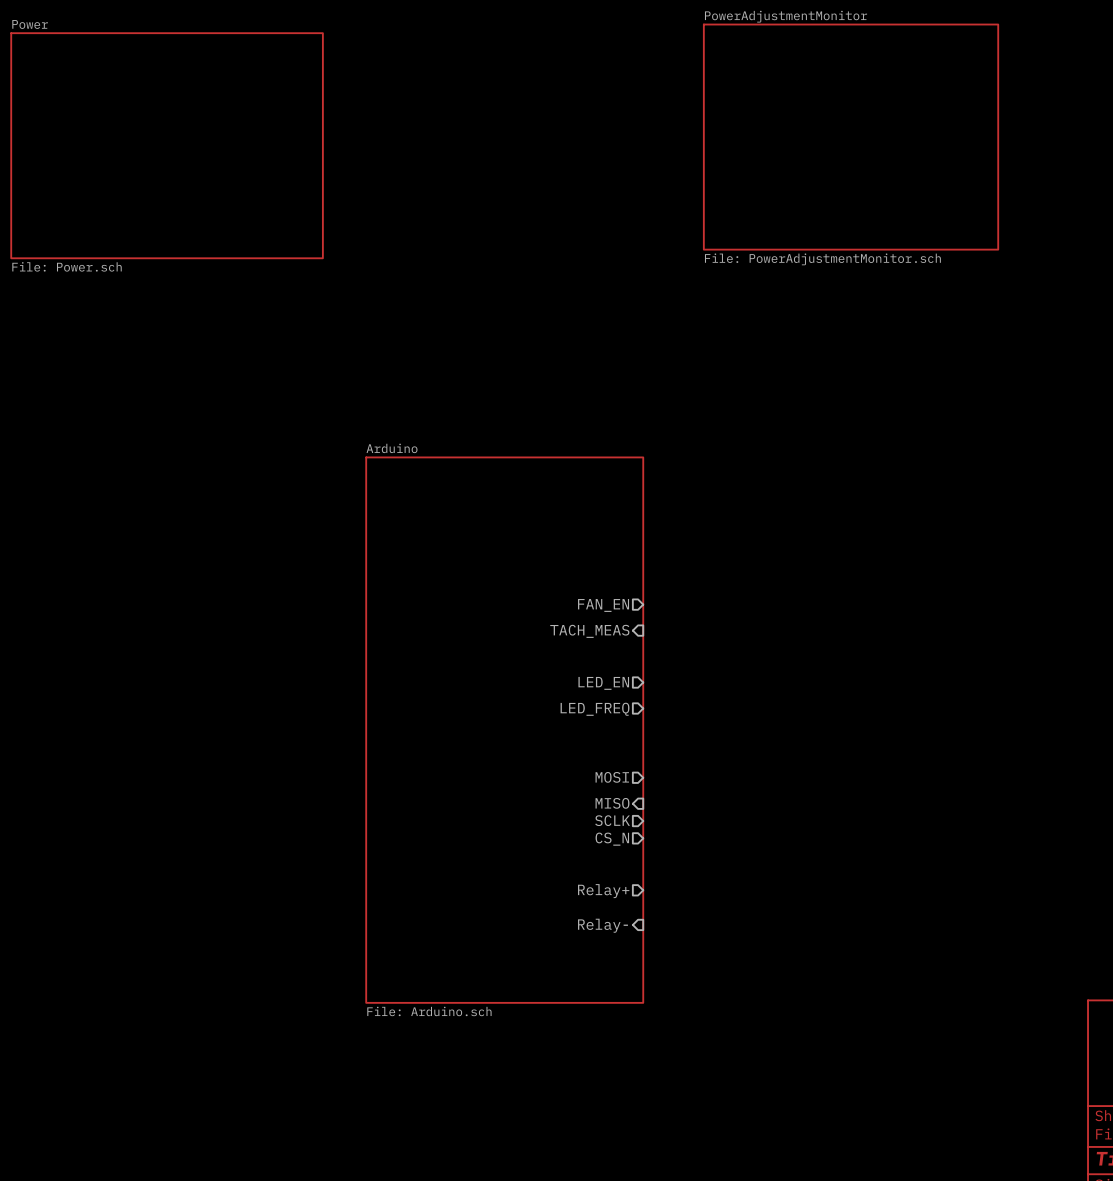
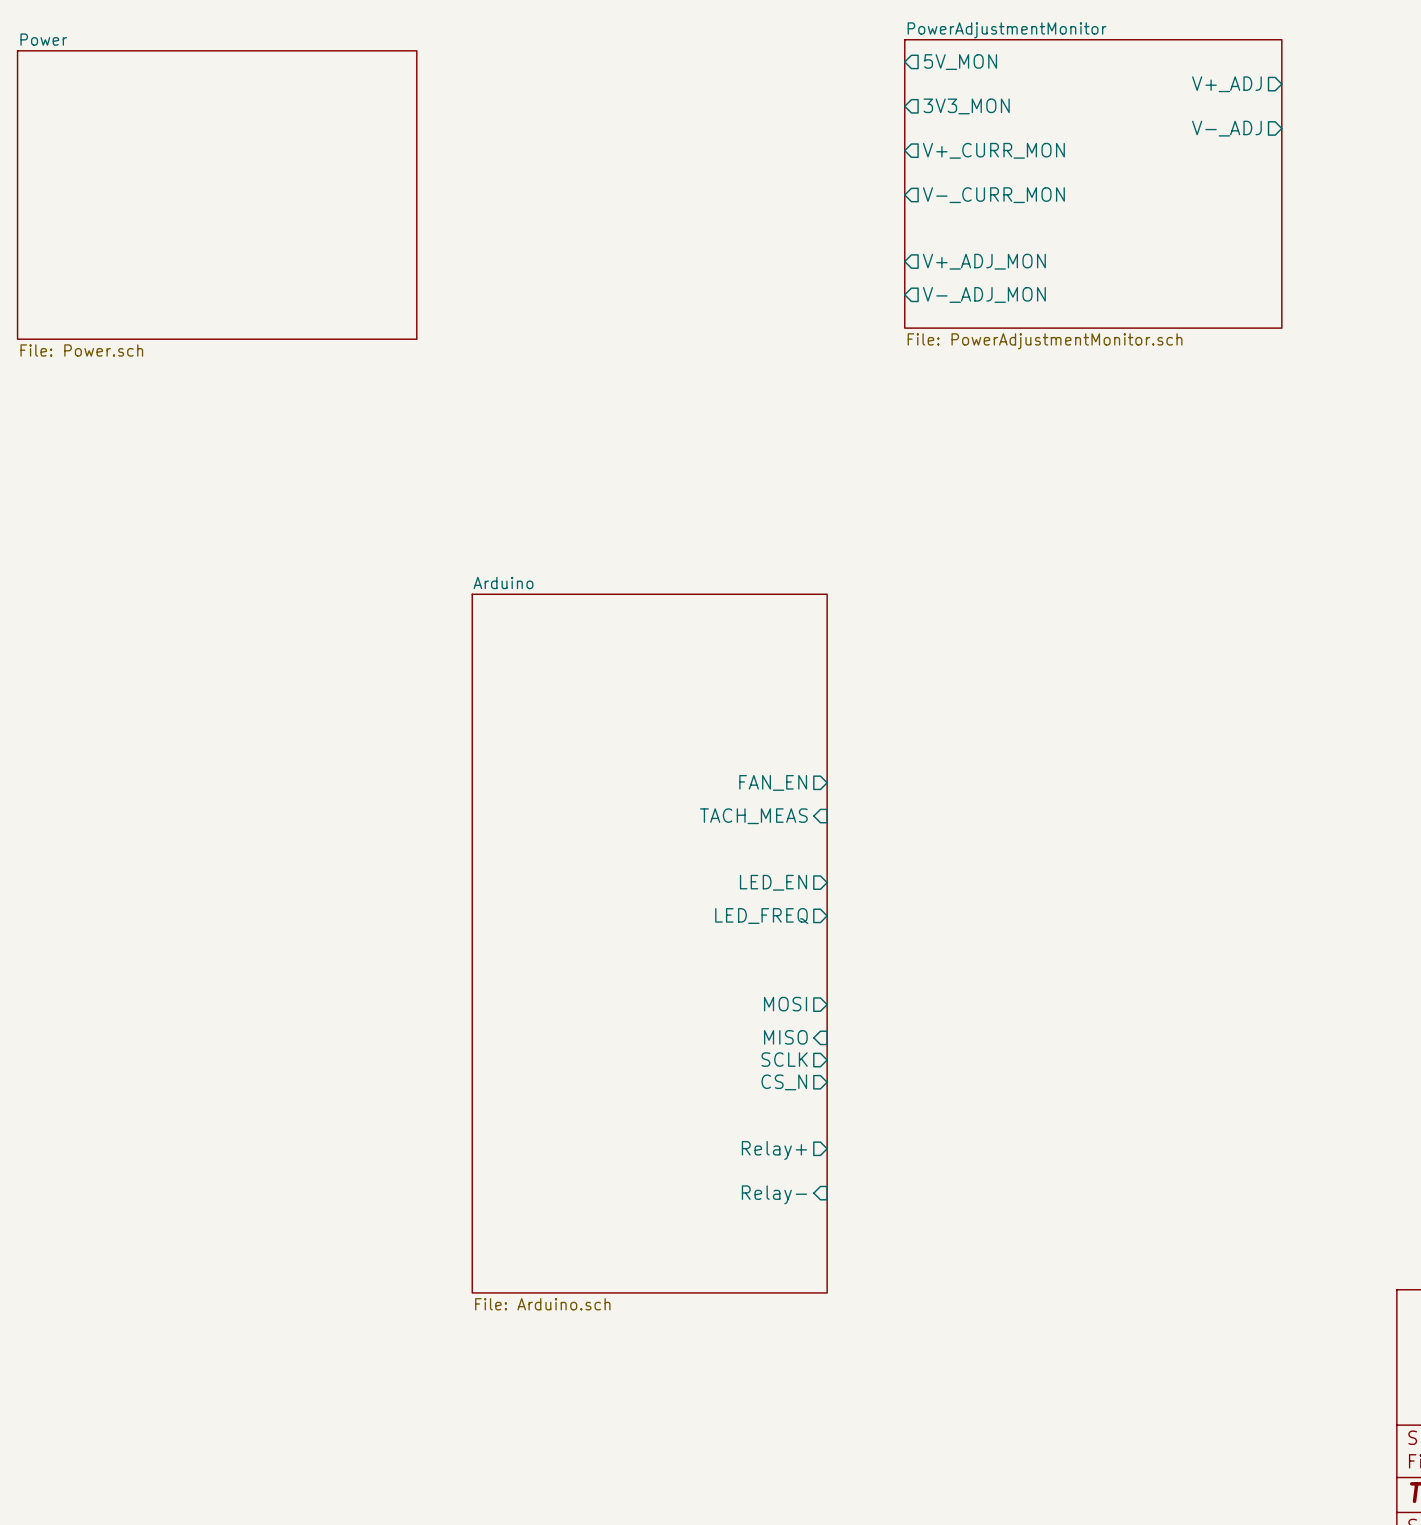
sheet pin: none -> 5V_MON (960, 62)
sheet pin: none -> V+_ADJ (1226, 84)
sheet pin: none -> 3V3_MON (966, 106)
sheet pin: none -> V-_ADJ (1226, 128)
sheet pin: none -> V+_CURR_MON (993, 150)
sheet pin: none -> V-_CURR_MON (993, 195)
sheet pin: none -> V+_ADJ_MON (984, 261)
sheet pin: none -> V-_ADJ_MON (984, 294)

